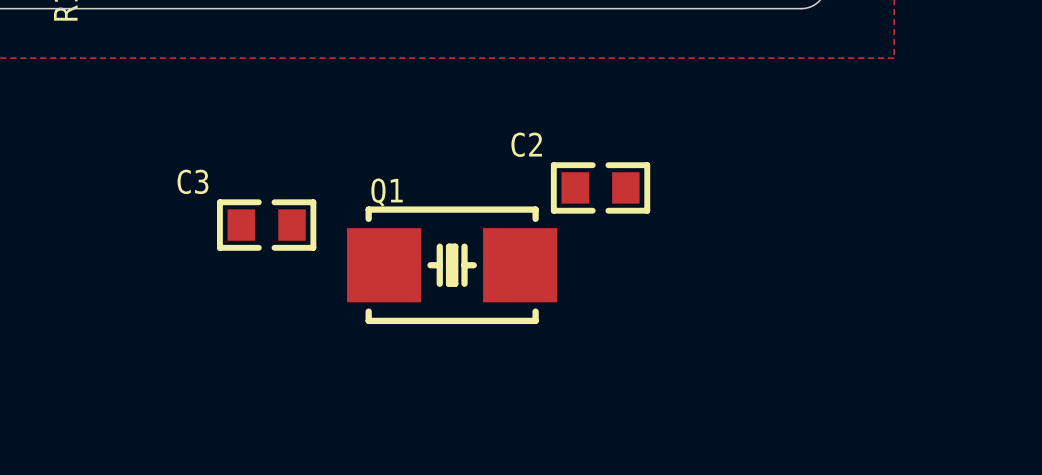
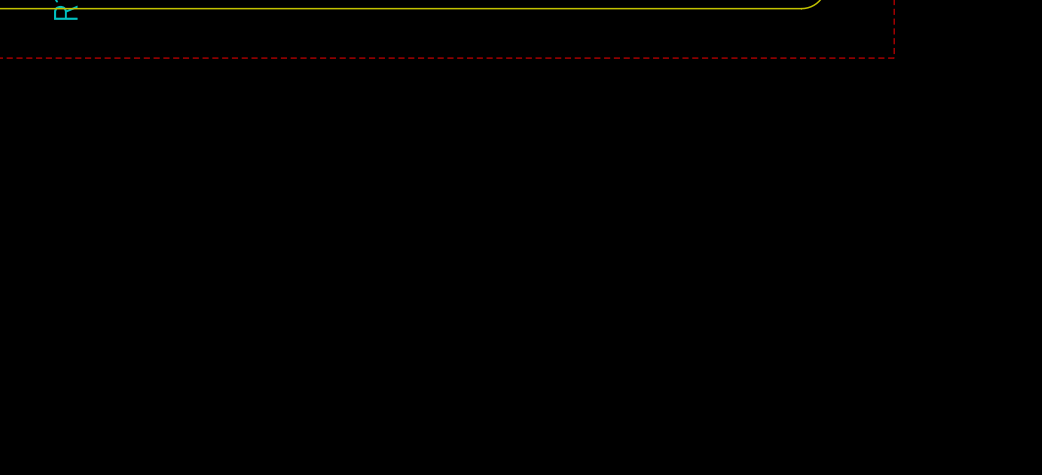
C2: (600, 187) -> none
C3: (266, 225) -> none
Q1: (452, 265) -> none

